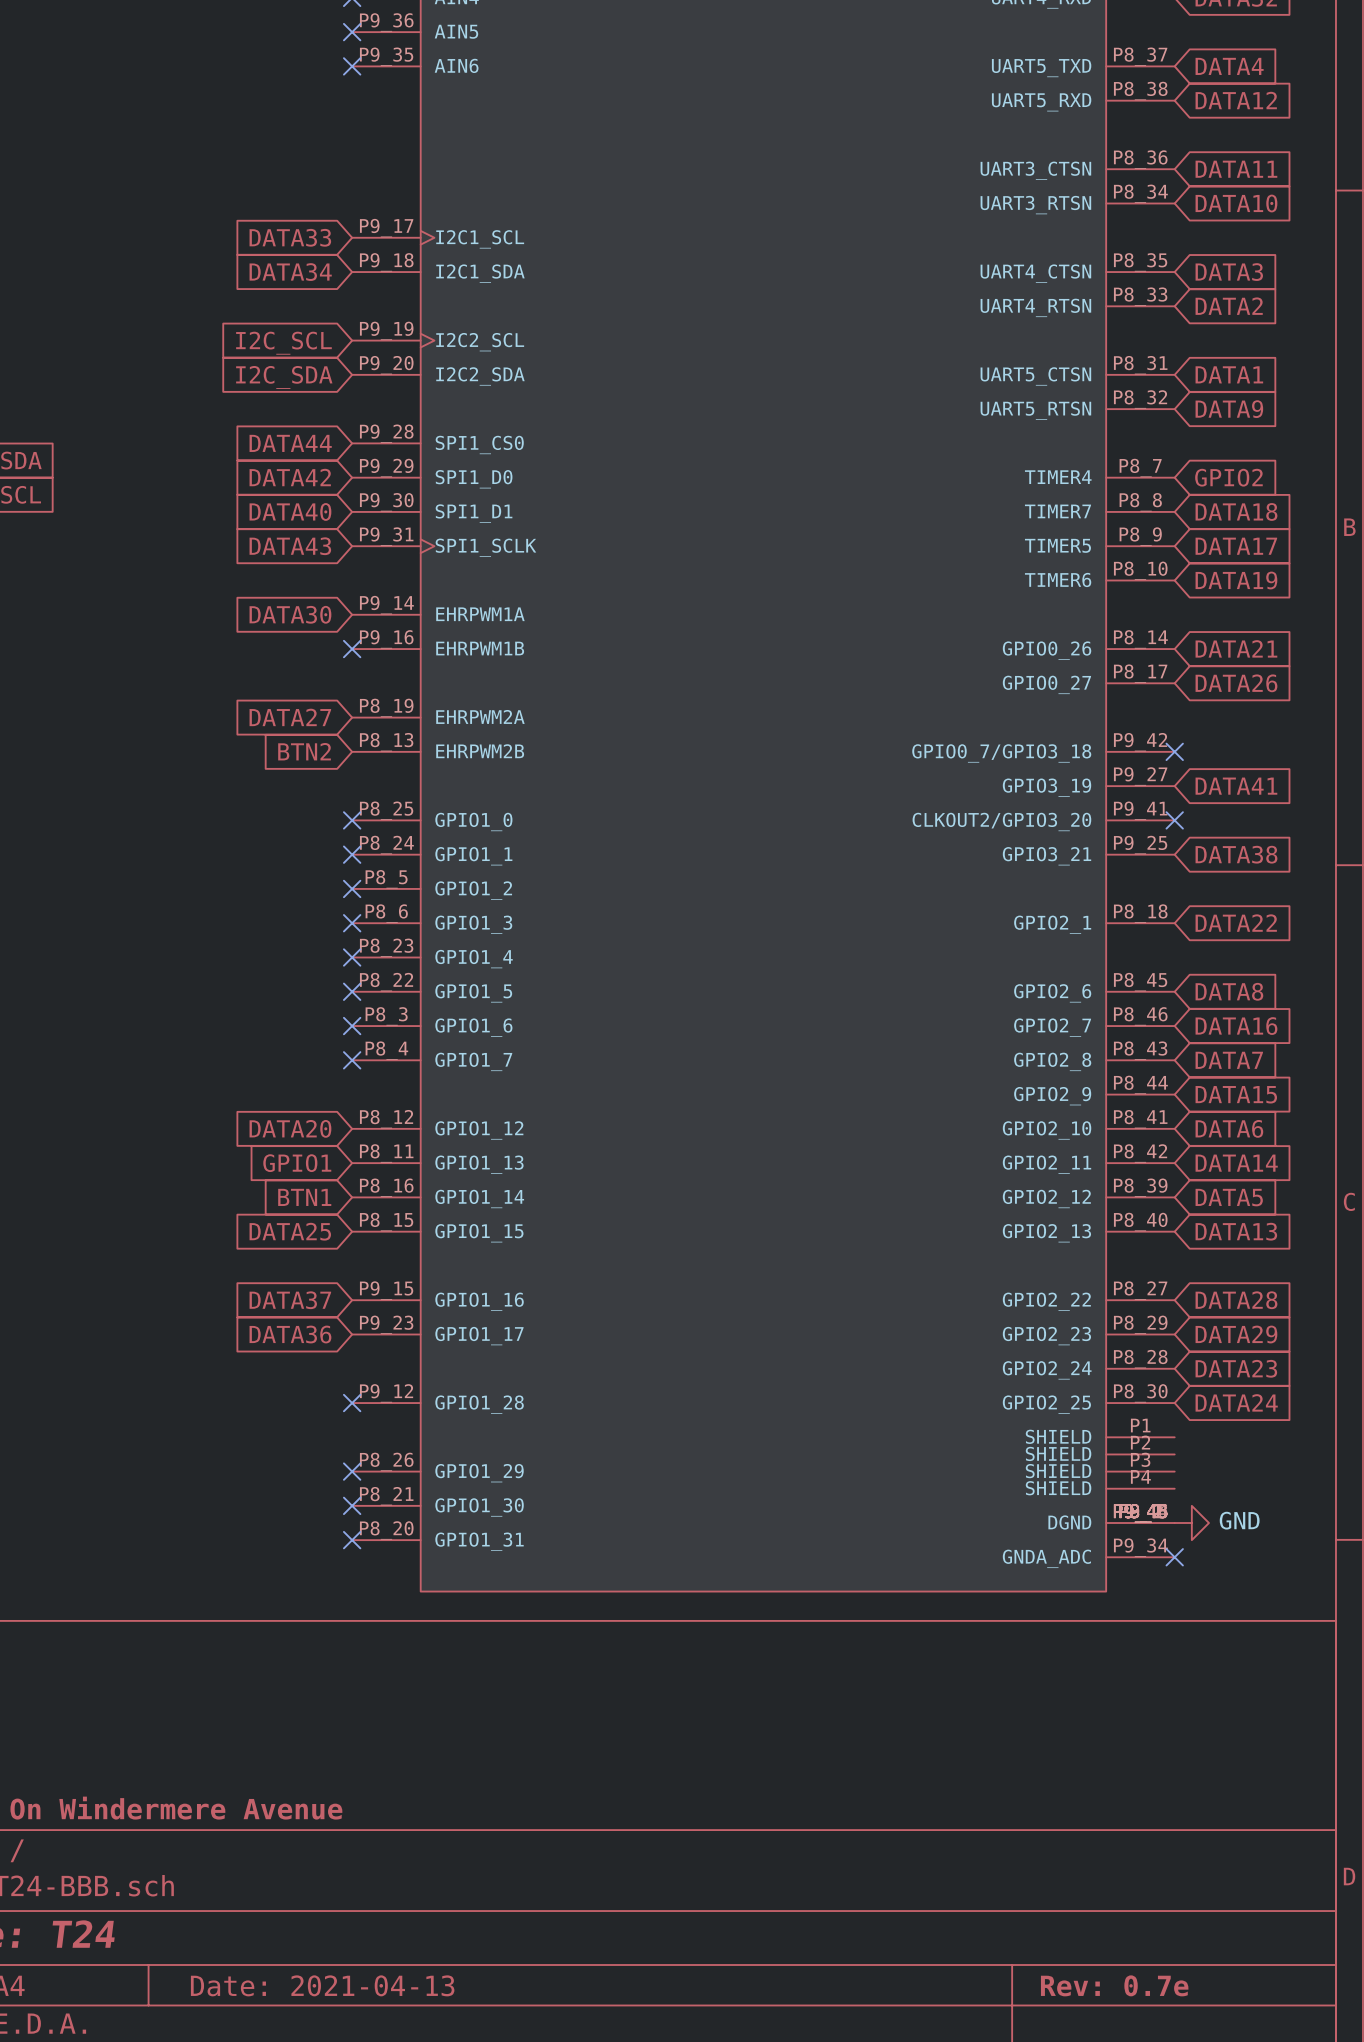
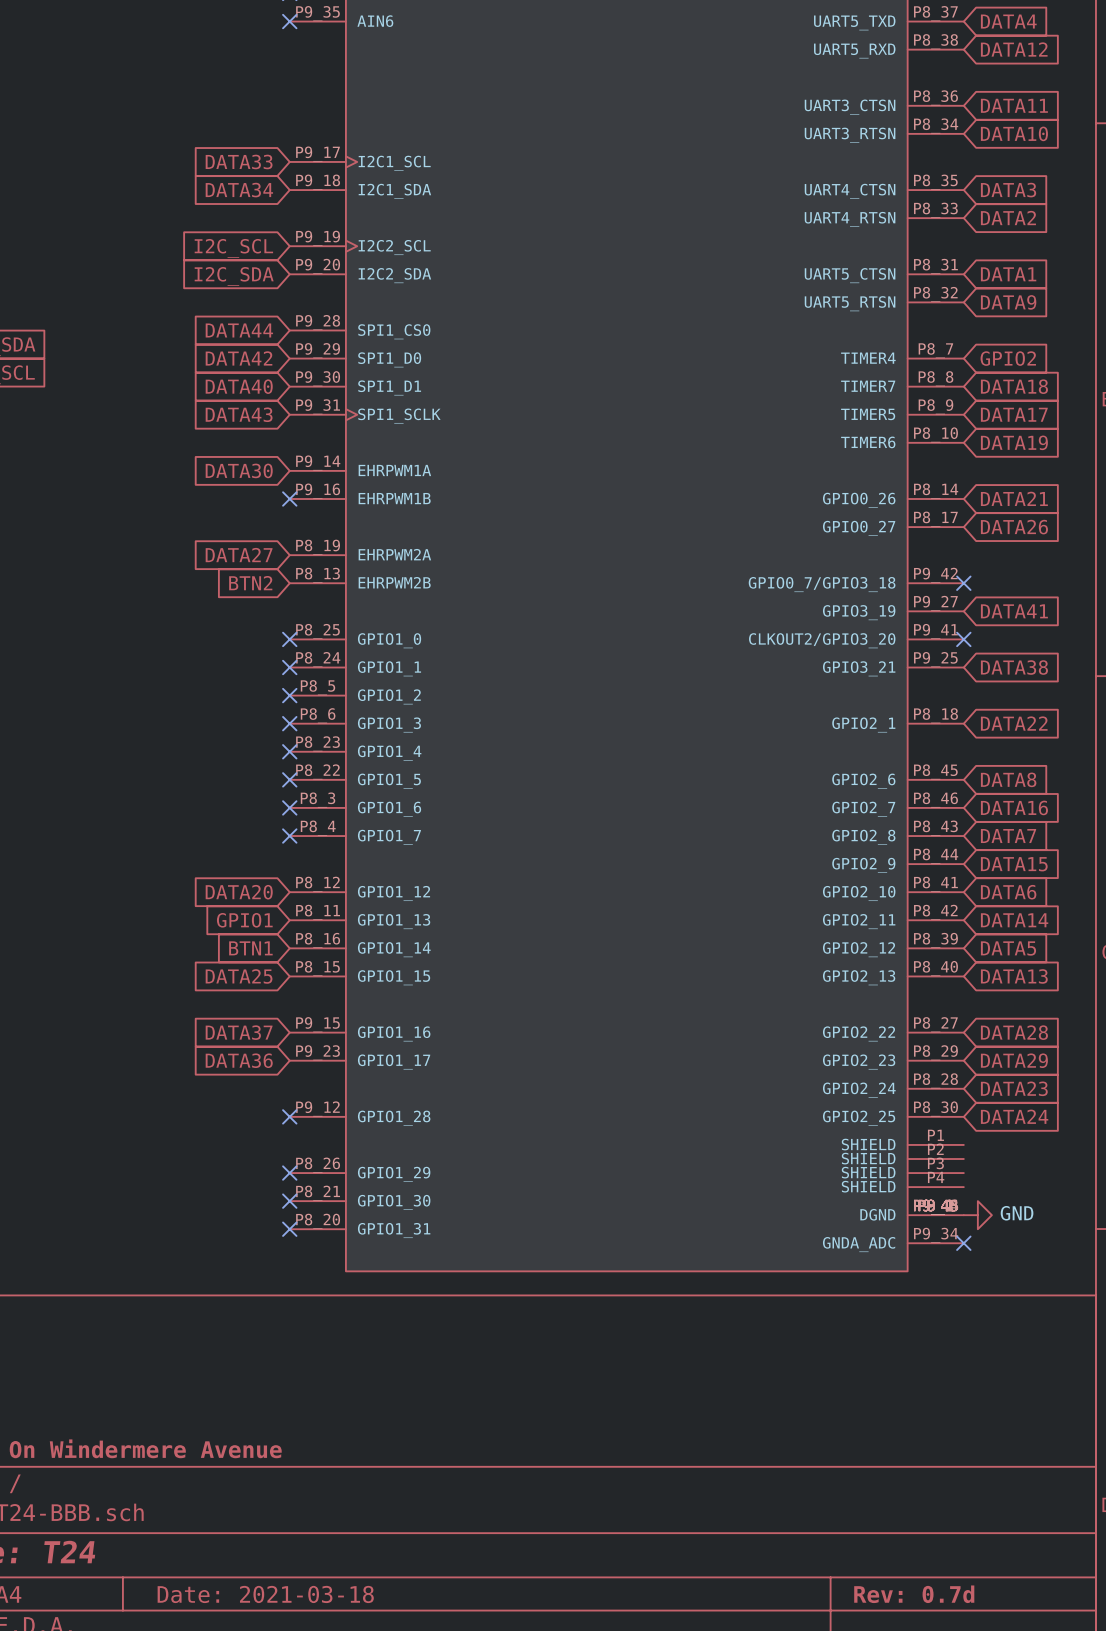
title block: Date: 2021-04-13 (322, 1985) -> Date: 2021-03-18 (265, 1594)
title block: Rev: 0.7e (1114, 1985) -> Rev: 0.7d (914, 1594)

